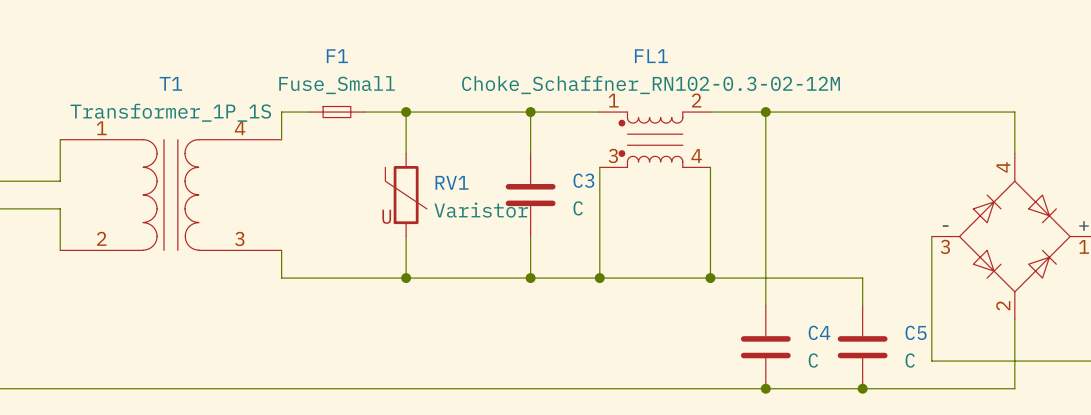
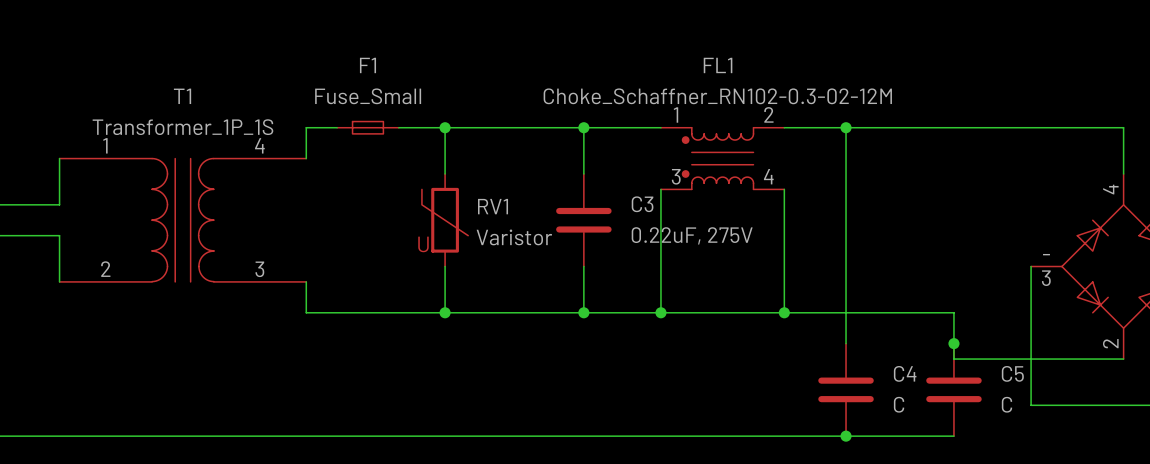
C3 value: C (578, 208) -> 0.22uF, 275V (692, 235)
junction: none -> (953, 343)
wire: (1014, 319) (1014, 388) (862, 388) -> (1123, 359) (953, 359) (953, 343)
junction: (862, 388) -> none

